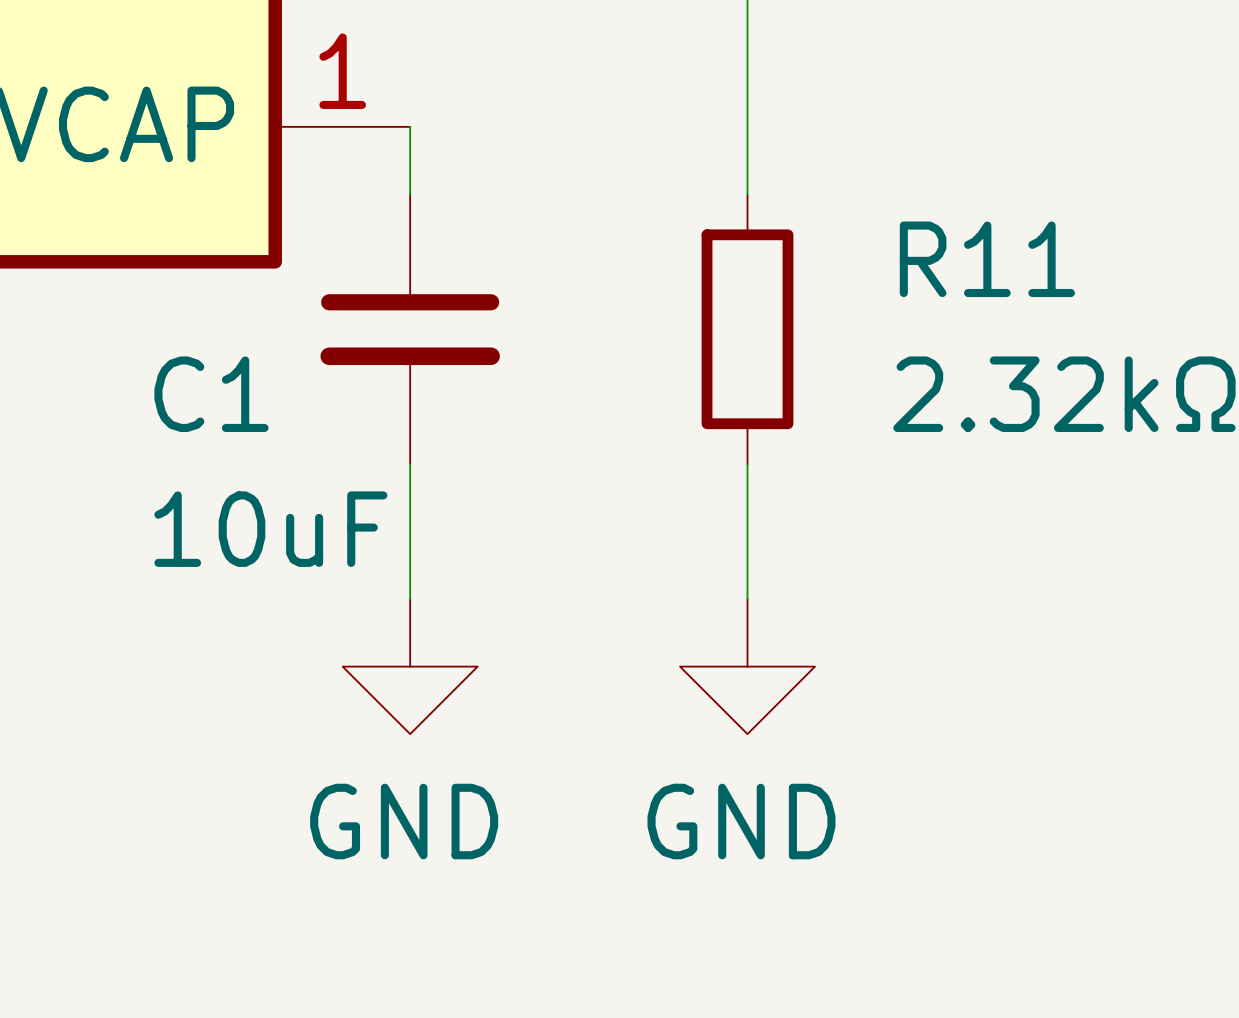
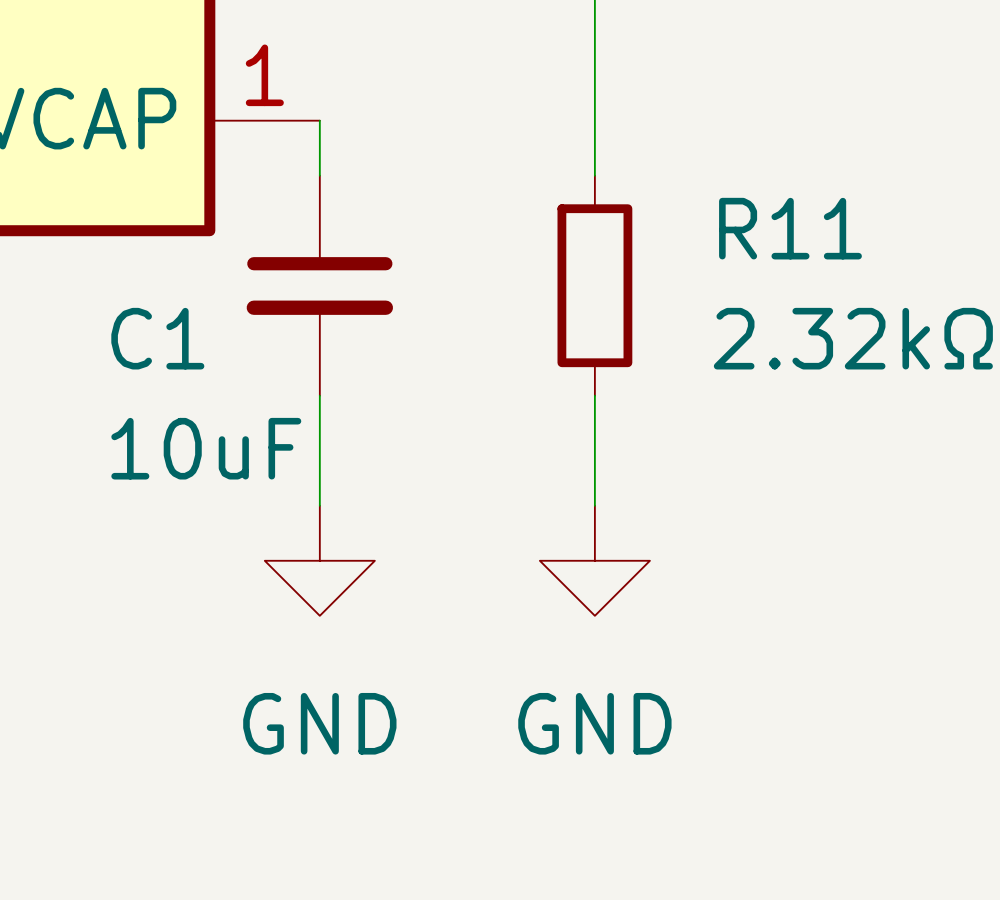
power symbol text position: GND (404, 821) -> GND (319, 723)
power symbol text position: GND (741, 821) -> GND (594, 723)

